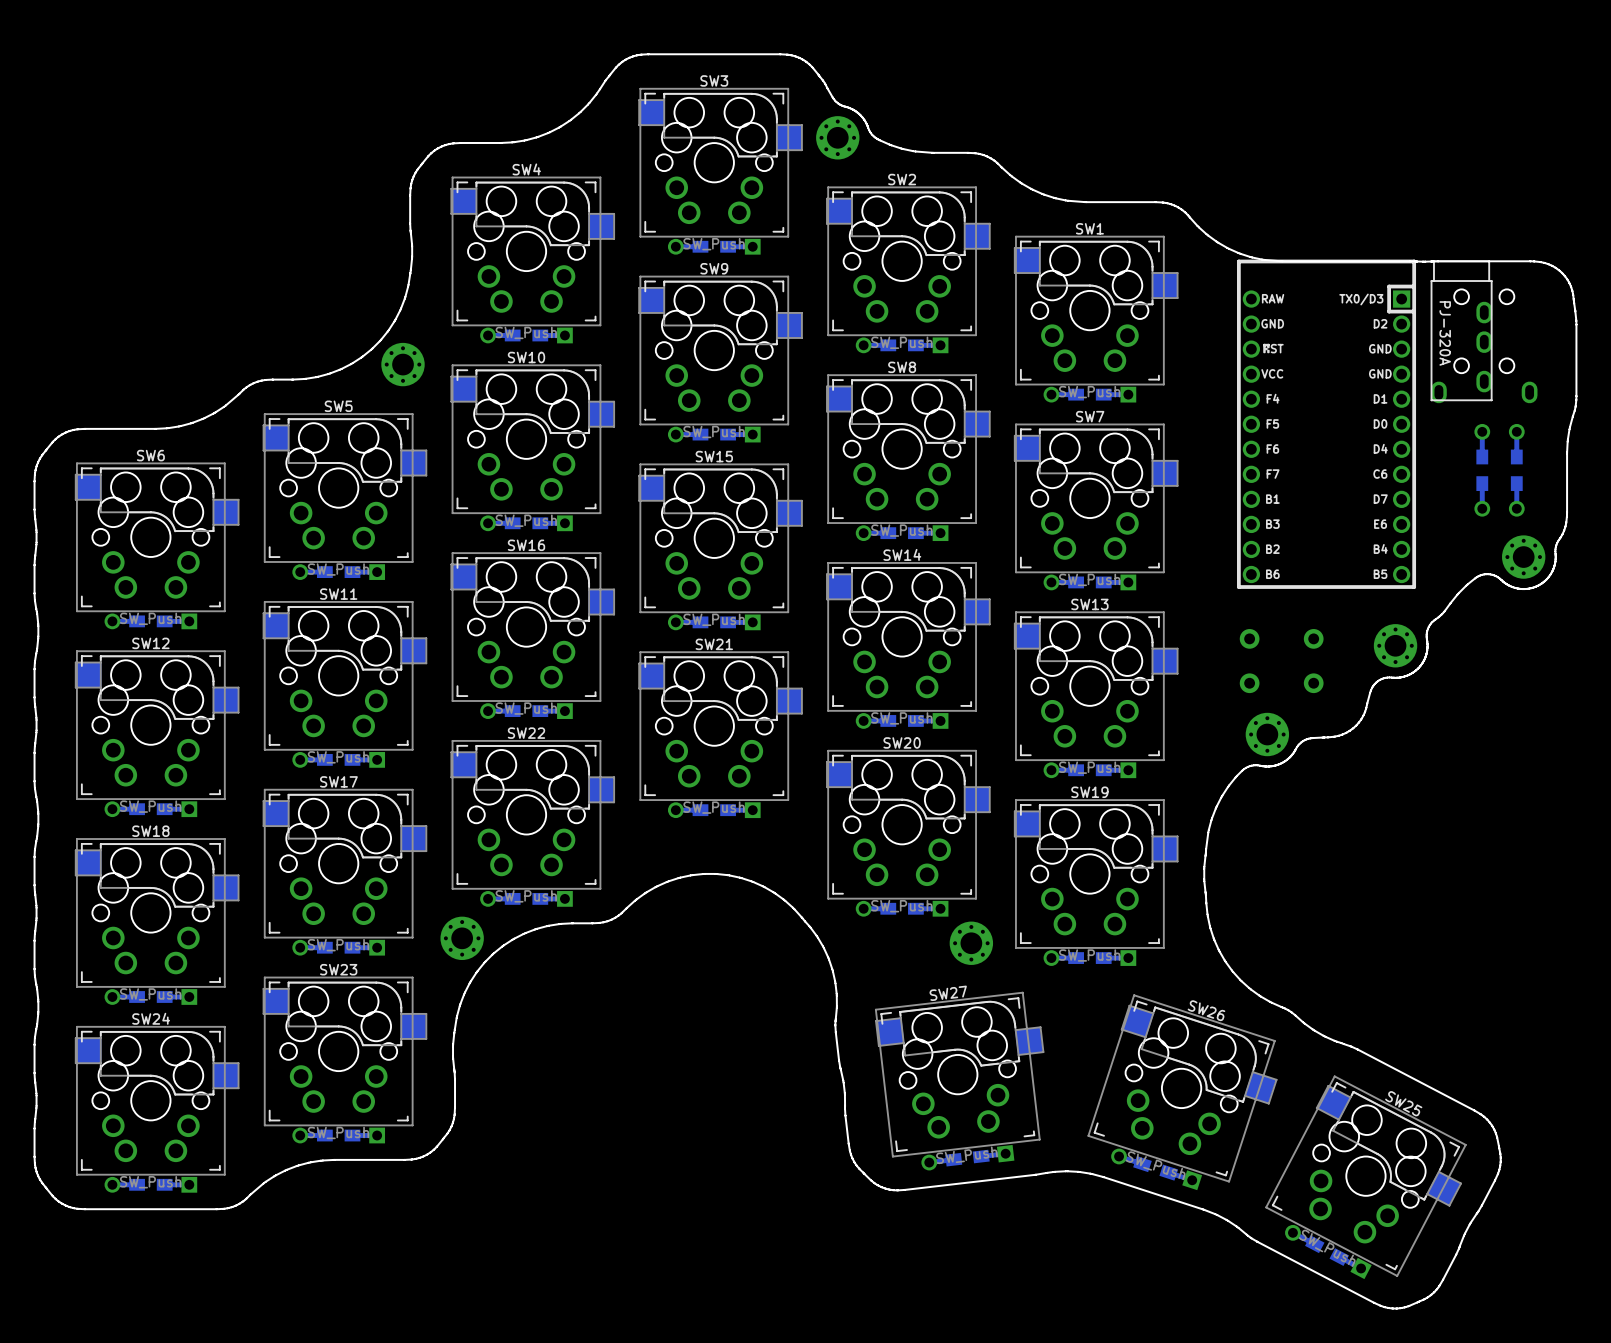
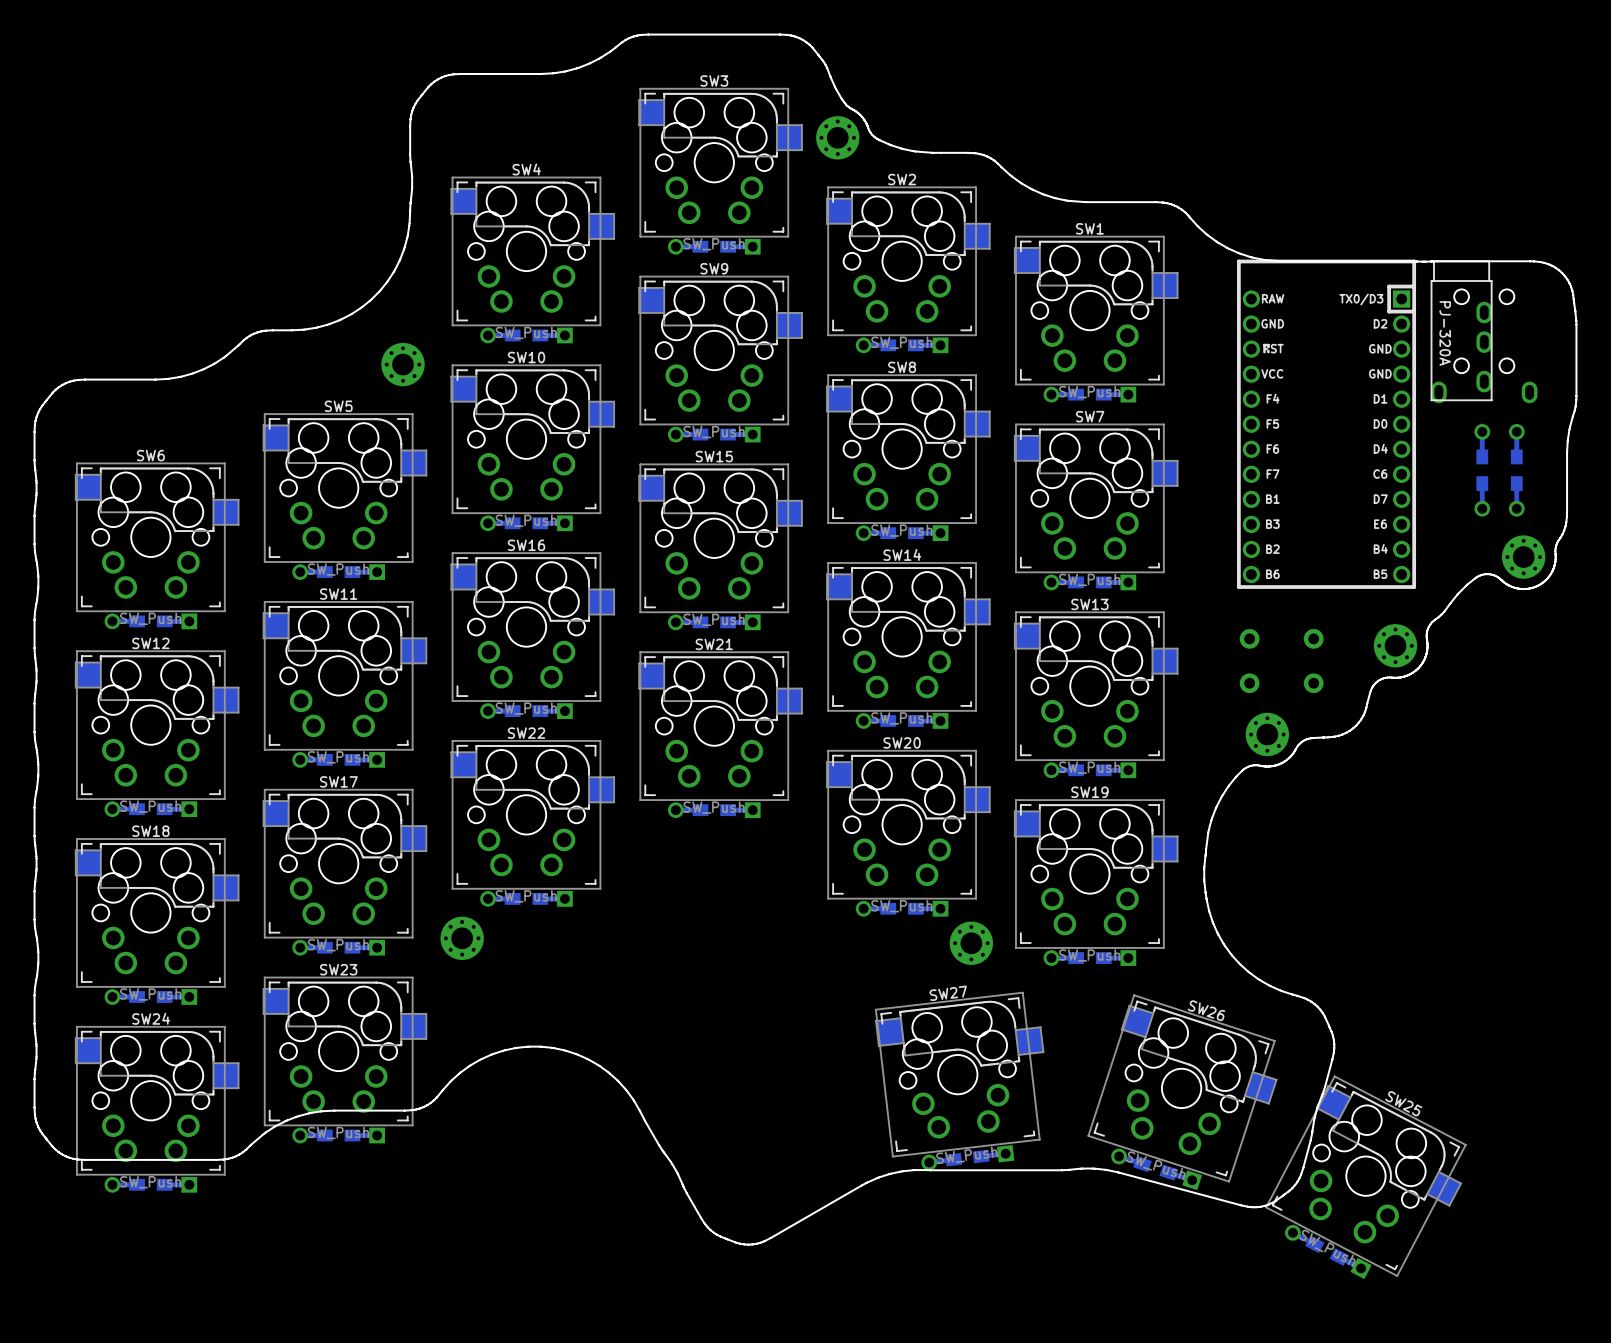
board edge: (852, 109) (836, 102) (812, 67) (803, 59) (791, 55) (636, 55) (625, 59) (616, 67) (596, 94) (579, 113) (549, 132) (514, 142) (453, 143) (434, 150) (413, 176) (410, 188) (410, 210) -> (852, 109) (841, 98) (825, 64) (812, 48) (799, 38) (786, 34) (640, 35) (626, 39) (590, 63) (564, 71) (541, 73) (448, 75) (430, 84) (417, 100) (412, 111) (410, 126) (412, 177) (410, 210)
board edge: (410, 211) (412, 258) (404, 298) (387, 331) (361, 357) (341, 368) (318, 376) (257, 381) (246, 387) (215, 412) (180, 426) (155, 428) (85, 428) (69, 431) (53, 441) (36, 465) (34, 481) (36, 532) (34, 593) (38, 636) (34, 668) (36, 730) (34, 780) (38, 824) (34, 856) (36, 918) (34, 968) (38, 1012) (34, 1044) (36, 1095) (34, 1157) (35, 1168) (39, 1179) (55, 1199) (66, 1205) (78, 1208) (224, 1208) (242, 1201) (275, 1175) (308, 1162) (333, 1159) (411, 1159) (424, 1156) (437, 1146) (452, 1123) (455, 1107) (453, 1046) (457, 1016) (469, 983) (492, 954) (514, 938) (536, 928) (559, 924) (599, 922) (610, 919) (644, 893) (668, 881) (692, 875) (717, 874) (751, 881) (775, 893) (801, 917) (823, 948) (835, 983) (835, 1032) (843, 1082) (850, 1151) (857, 1166) (877, 1185) (898, 1190) (1055, 1171) (1090, 1173) (1217, 1215) (1257, 1241) (1381, 1305) (1401, 1308) (1424, 1299) (1434, 1291) (1442, 1279) (1464, 1233) (1497, 1174) (1500, 1157) (1494, 1129) (1486, 1119) (1474, 1110) (1358, 1049) (1323, 1035) (1288, 1010) (1269, 1001) (1249, 988) (1231, 970) (1218, 949) (1209, 926) (1205, 894) -> (410, 211) (404, 247) (393, 272) (371, 299) (350, 314) (315, 327) (257, 332) (246, 338) (215, 363) (180, 376) (155, 379) (85, 379) (70, 381) (53, 392) (36, 416) (34, 432) (36, 482) (34, 543) (38, 587) (34, 619) (36, 681) (34, 731) (38, 774) (34, 807) (36, 868) (34, 919) (38, 962) (34, 995) (36, 1046) (34, 1107) (35, 1119) (39, 1129) (55, 1149) (69, 1157) (84, 1159) (228, 1158) (242, 1152) (275, 1125) (308, 1113) (333, 1110) (404, 1110) (420, 1108) (433, 1100) (459, 1073) (479, 1059) (504, 1050) (539, 1046) (564, 1050) (577, 1054) (599, 1066) (617, 1080) (634, 1101) (705, 1224) (717, 1235) (739, 1243) (752, 1244) (763, 1241) (867, 1182) (888, 1174) (913, 1170) (1094, 1168) (1118, 1172) (1241, 1205) (1252, 1207) (1263, 1206) (1275, 1201) (1289, 1190) (1300, 1175) (1317, 1108) (1332, 1059) (1333, 1039) (1324, 1016) (1315, 1004) (1259, 980) (1232, 955) (1213, 923) (1205, 894)

